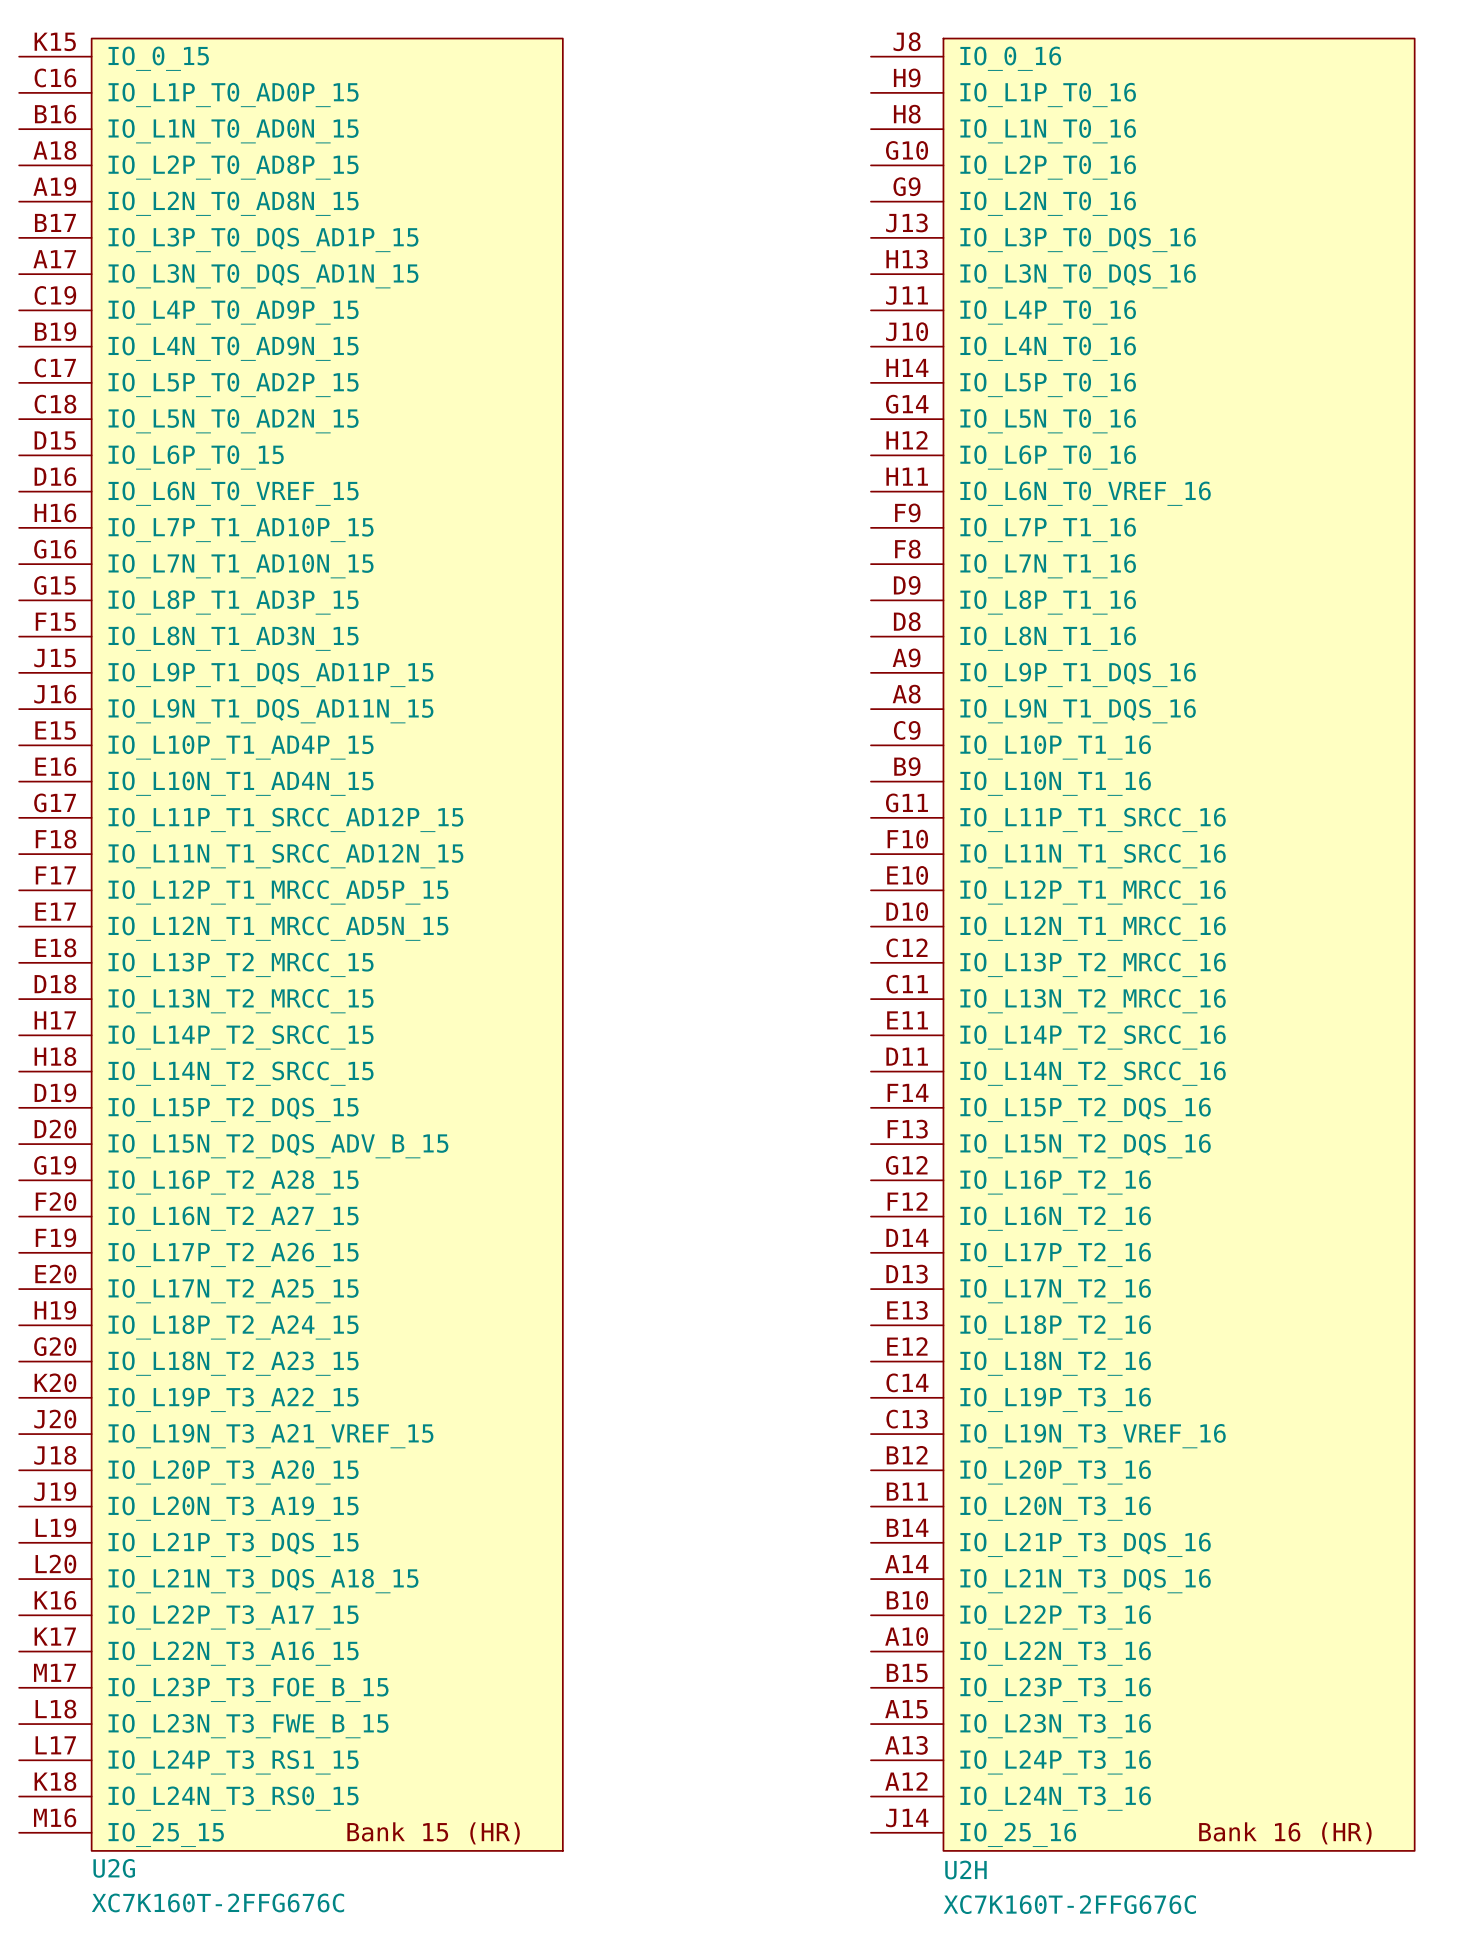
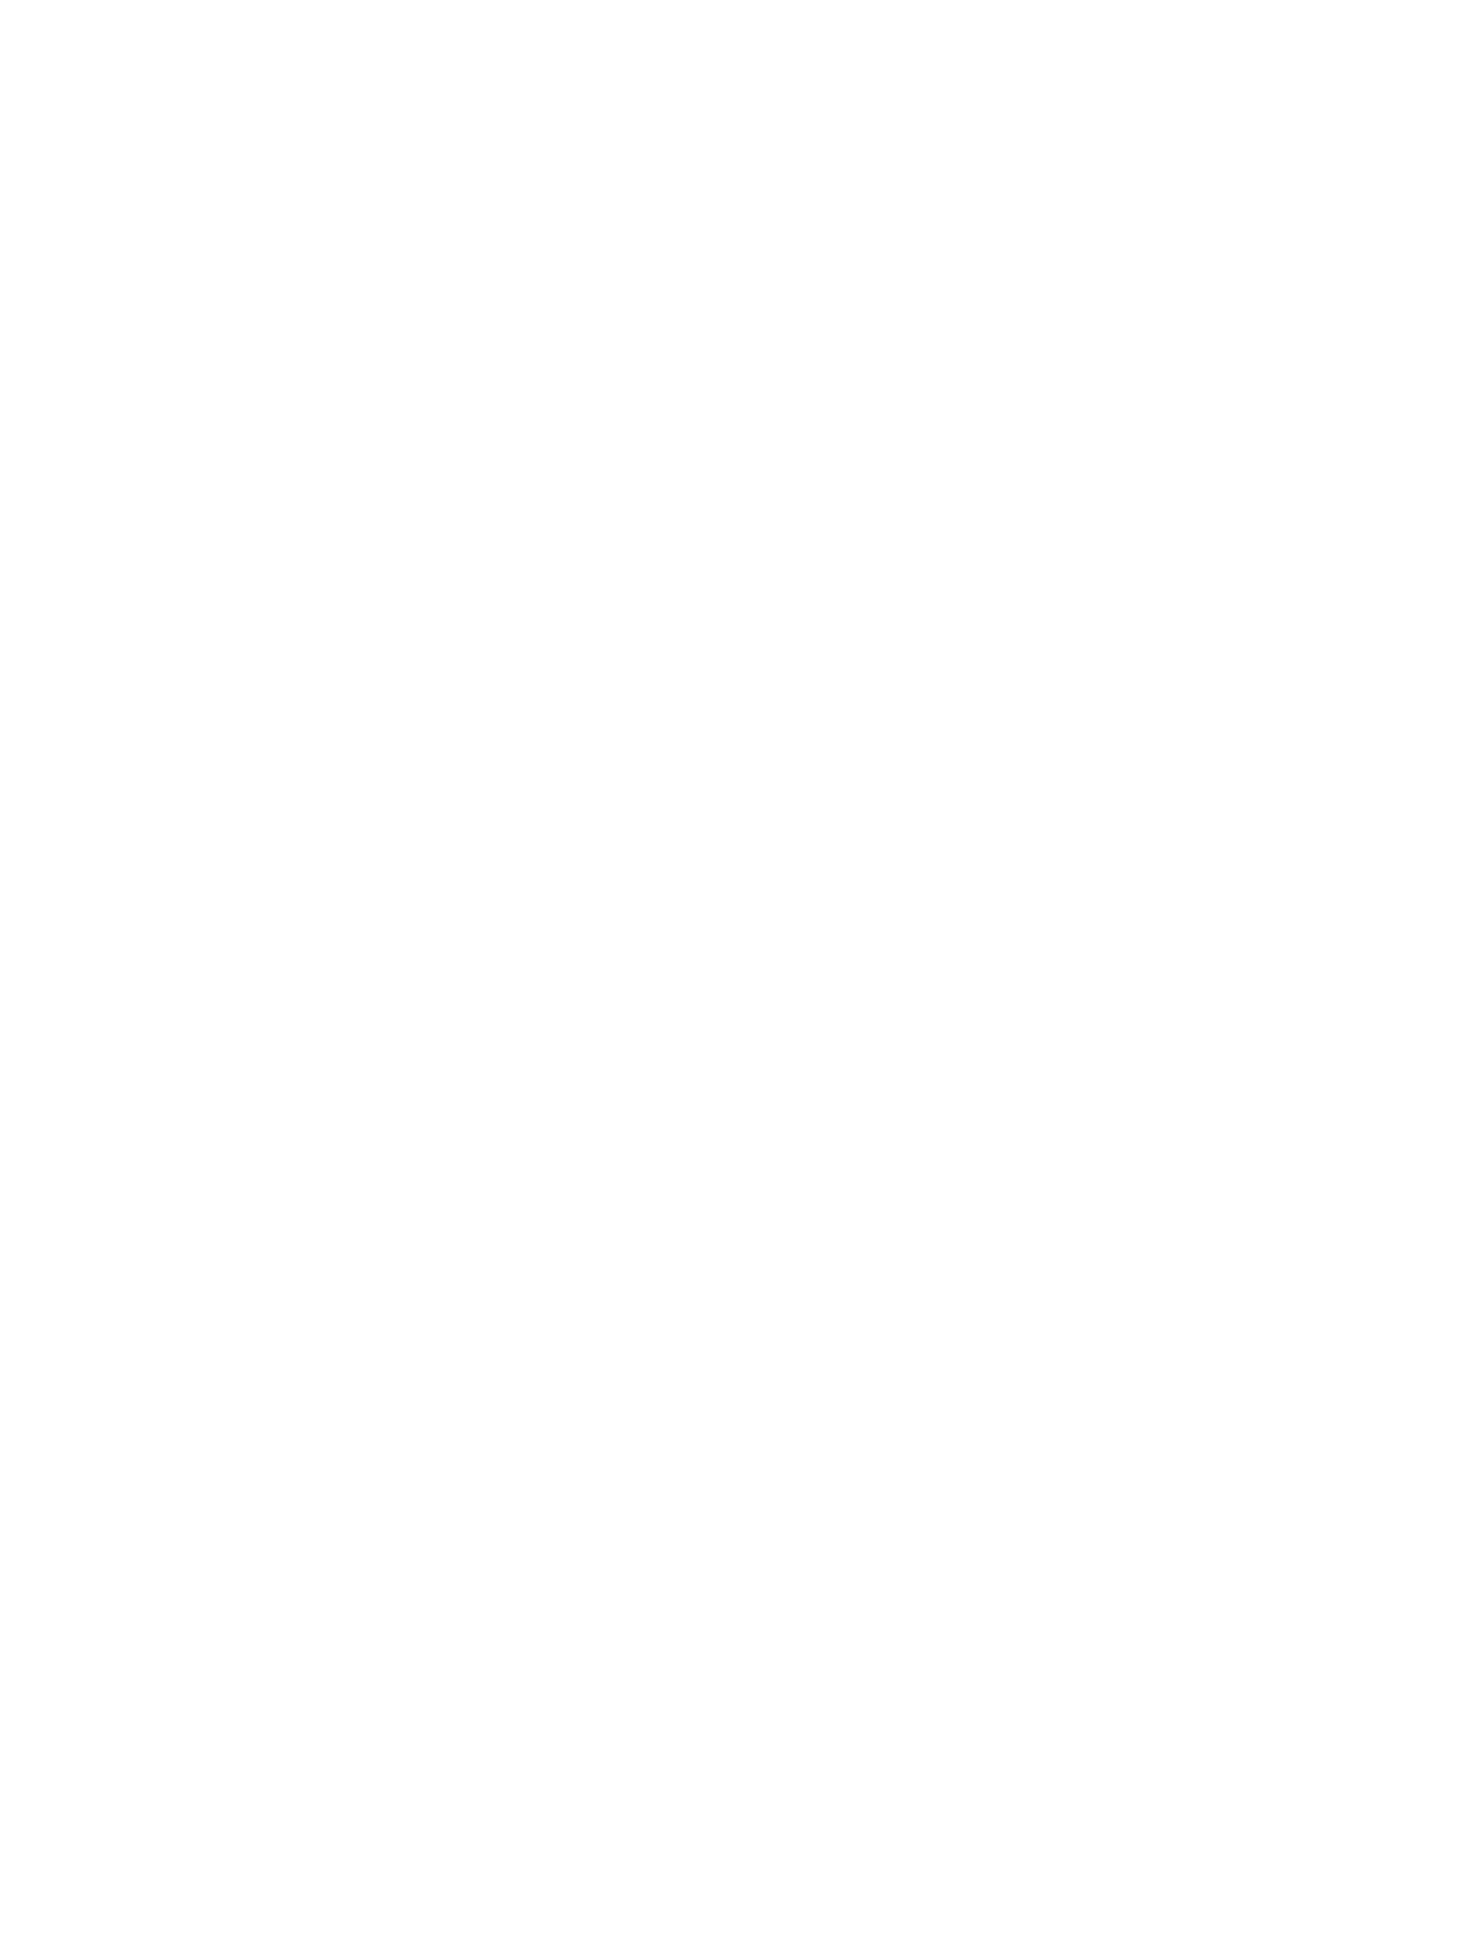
U2G: XC7K160T-2FFG676C (291, 944) -> none
U2H: XC7K160T-2FFG676C (1142, 944) -> none

